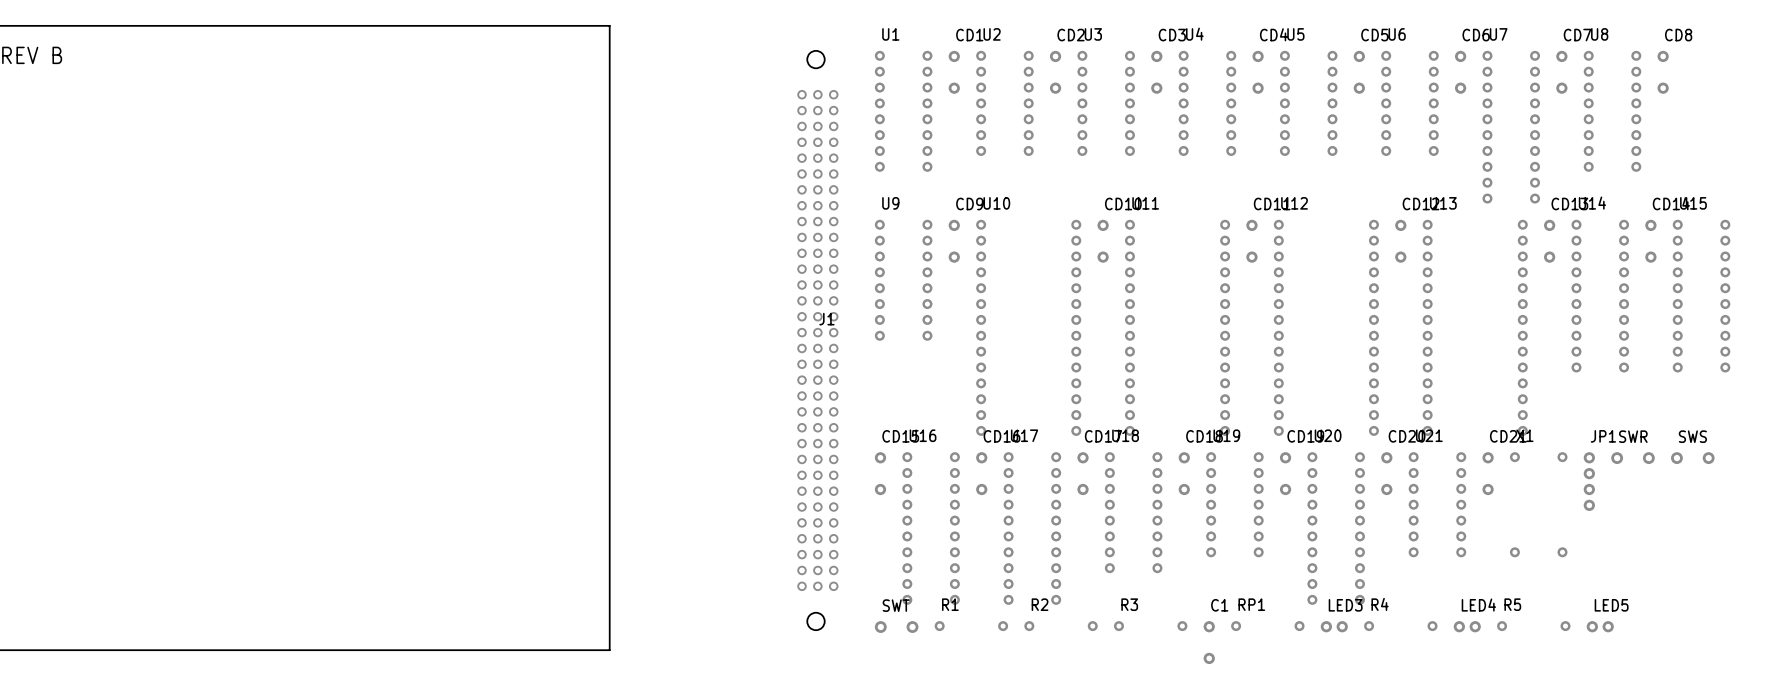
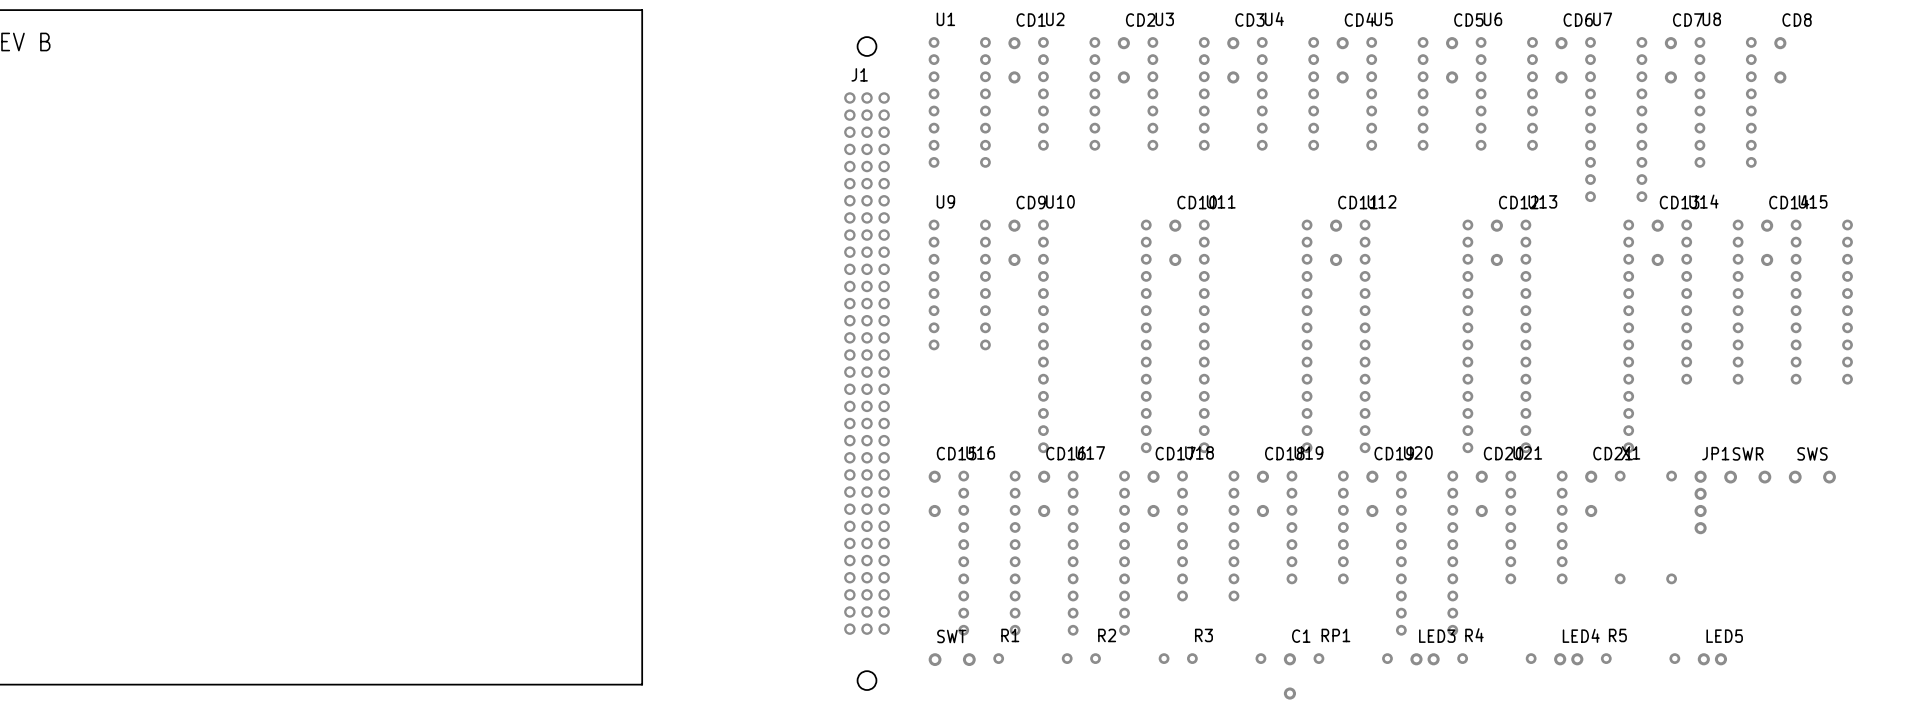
J1 footprint: [797, 50, 839, 631] -> [844, 37, 890, 691]
J1 name position: J1 (826, 319) -> J1 (859, 74)

